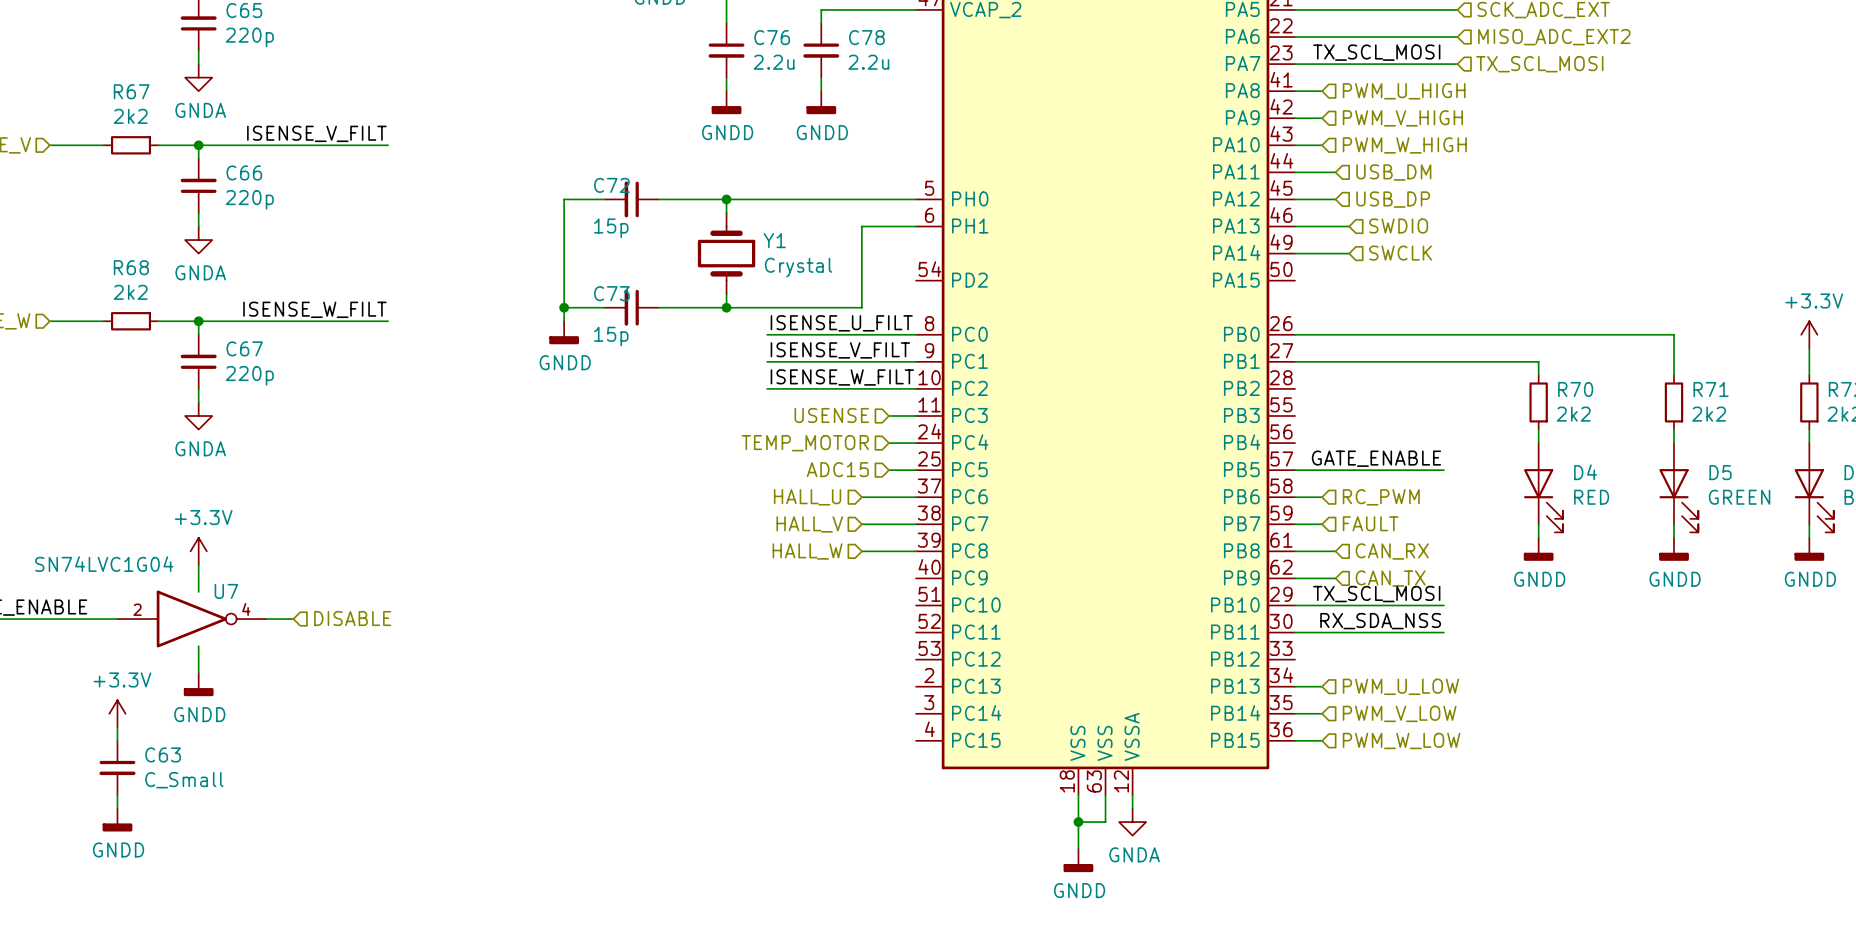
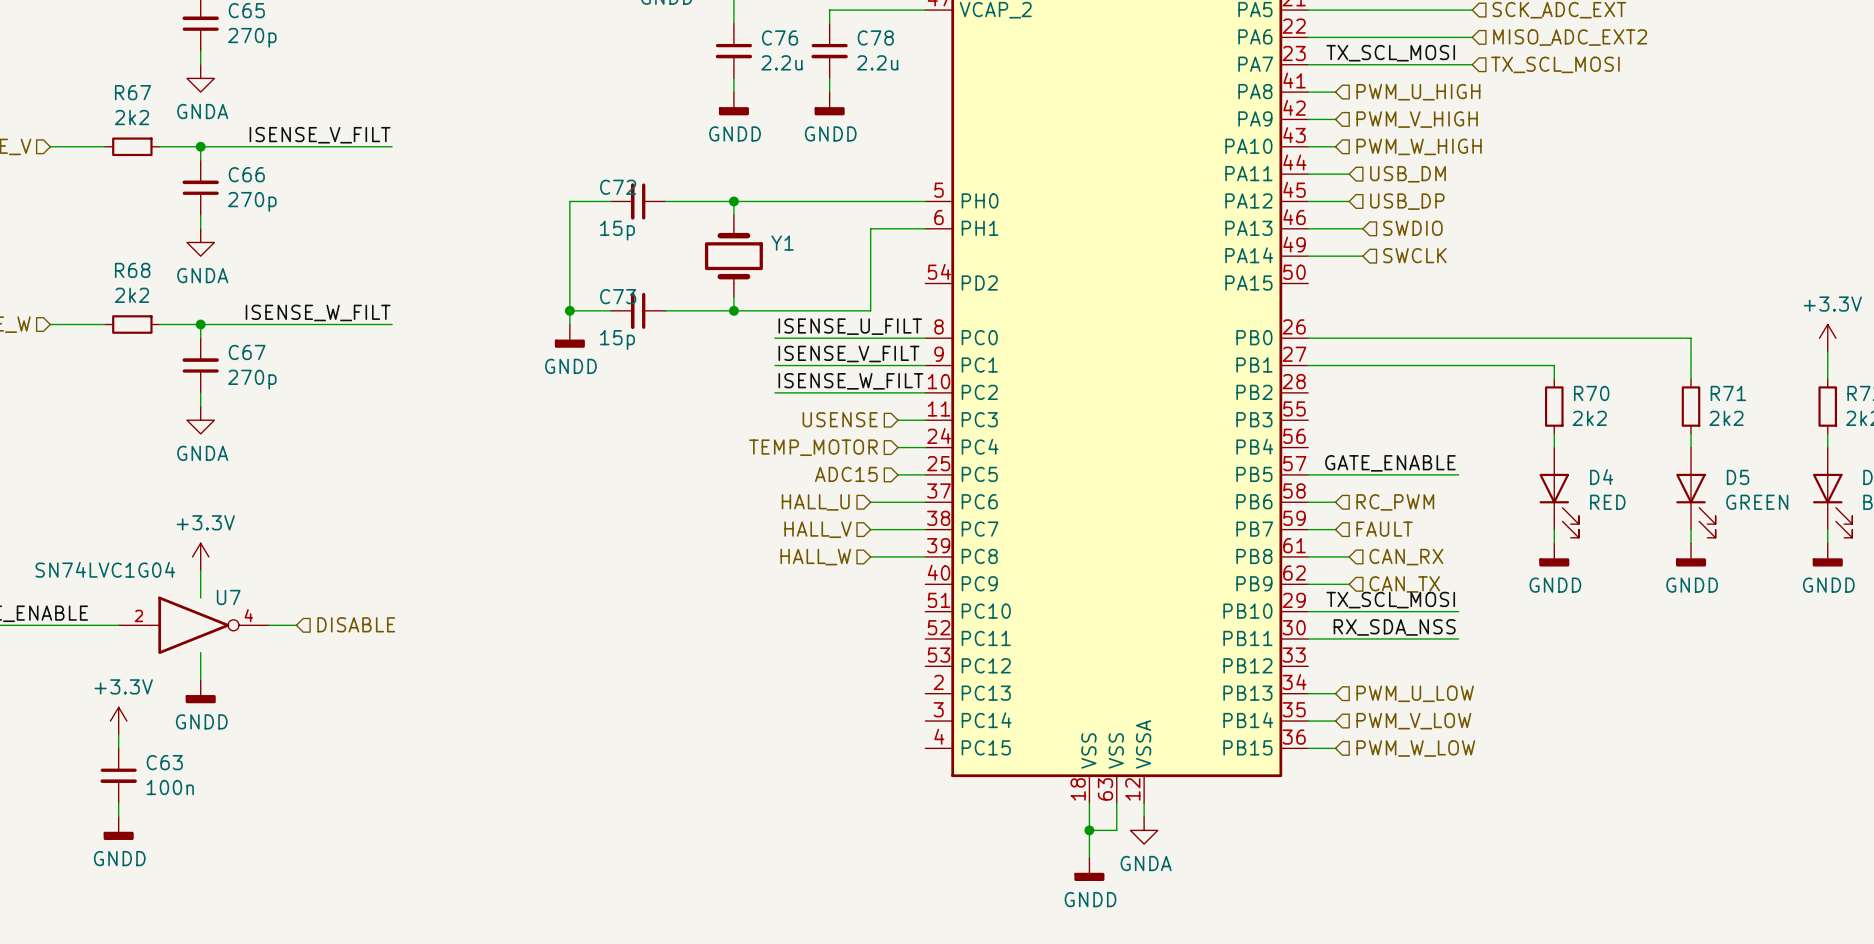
C65 value: 220p (249, 37) -> 270p (252, 37)
C66 value: 220p (249, 199) -> 270p (252, 201)
Y1 value: Crystal (798, 267) -> none
C67 value: 220p (249, 375) -> 270p (252, 379)
C63 value: C_Small (184, 780) -> 100n (170, 787)

